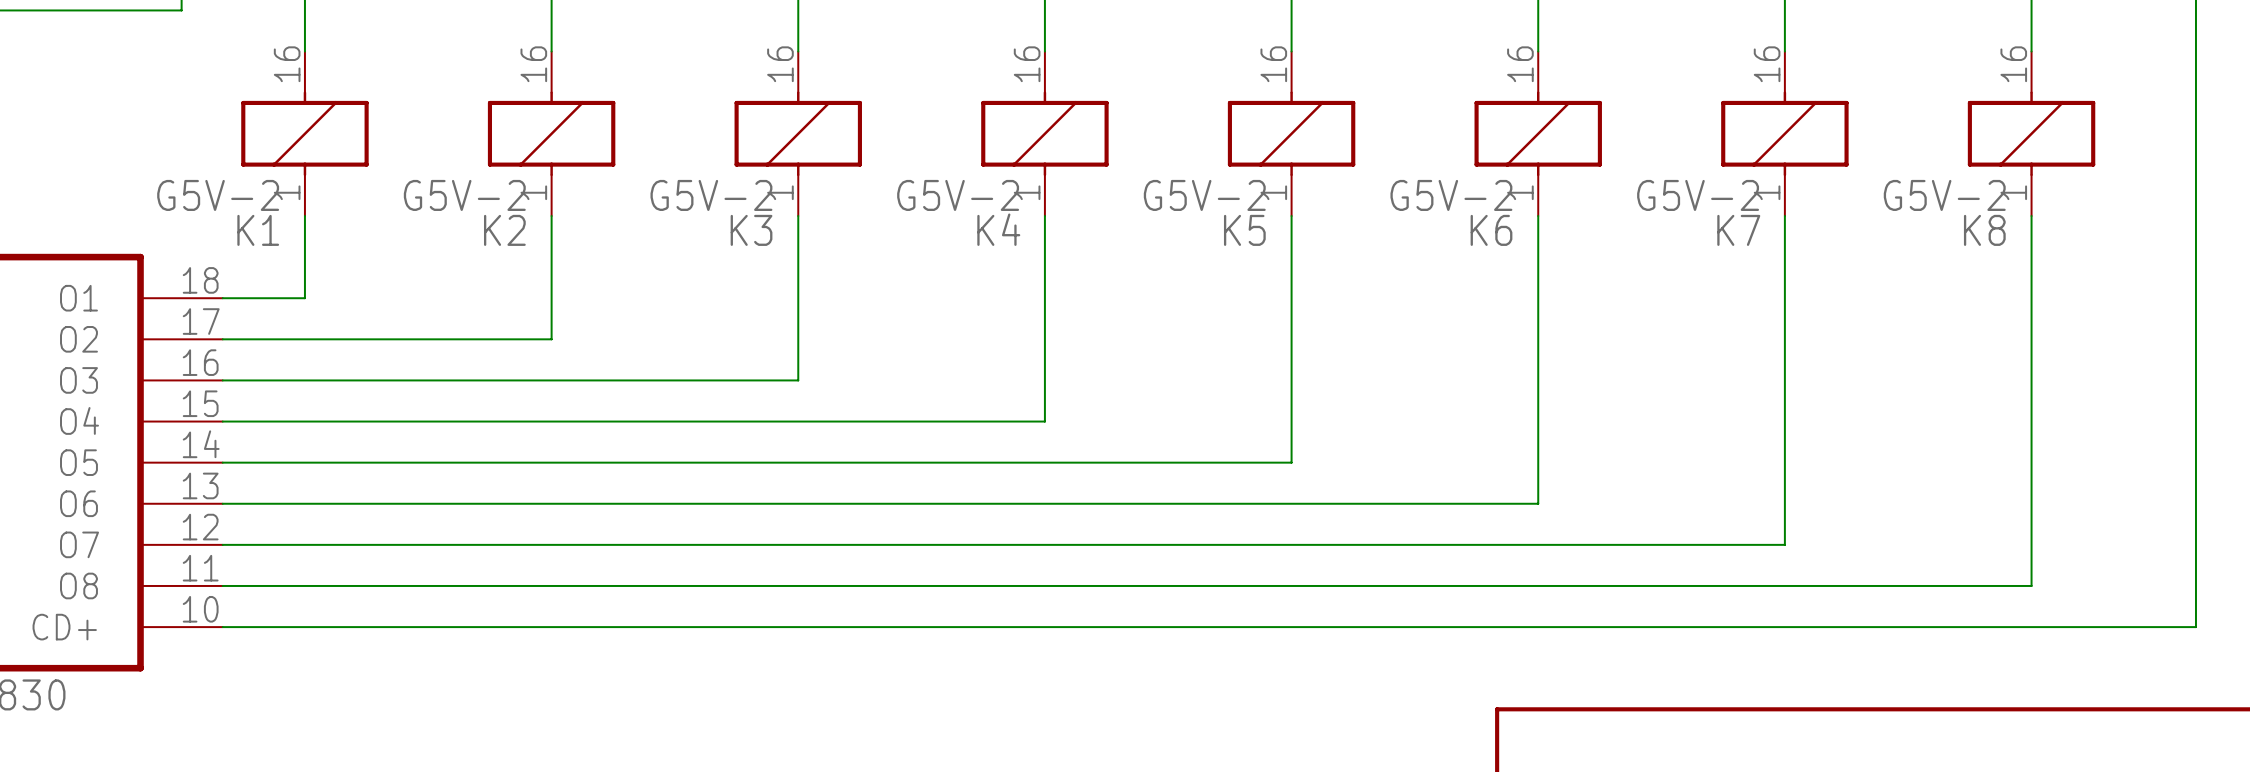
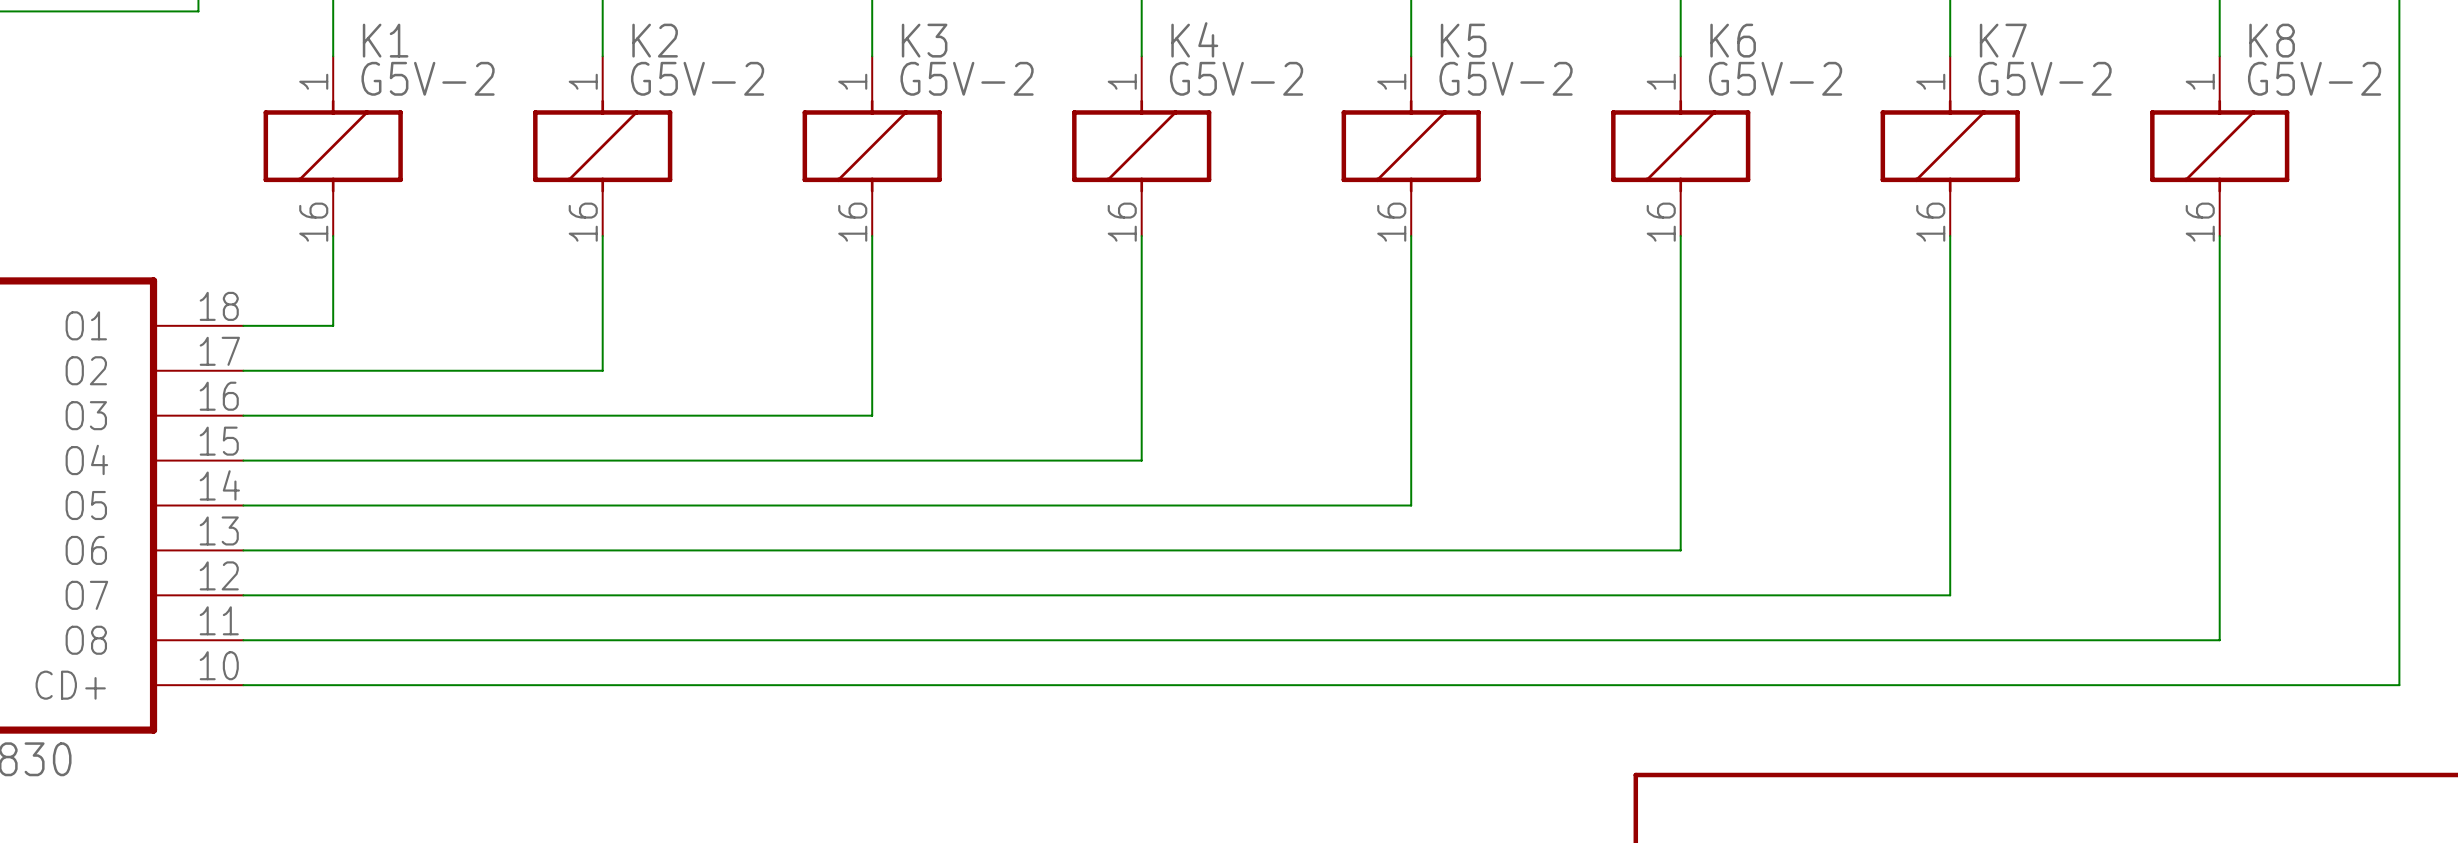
K1 rotation: 0° (304, 133) -> 180° (333, 146)
K2 rotation: 0° (551, 133) -> 180° (602, 146)
K3 rotation: 0° (798, 133) -> 180° (872, 146)
K4 rotation: 0° (1044, 133) -> 180° (1141, 146)
K5 rotation: 0° (1291, 133) -> 180° (1411, 146)
K6 rotation: 0° (1538, 133) -> 180° (1680, 146)
K7 rotation: 0° (1784, 133) -> 180° (1950, 146)
K8 rotation: 0° (2031, 133) -> 180° (2219, 146)

